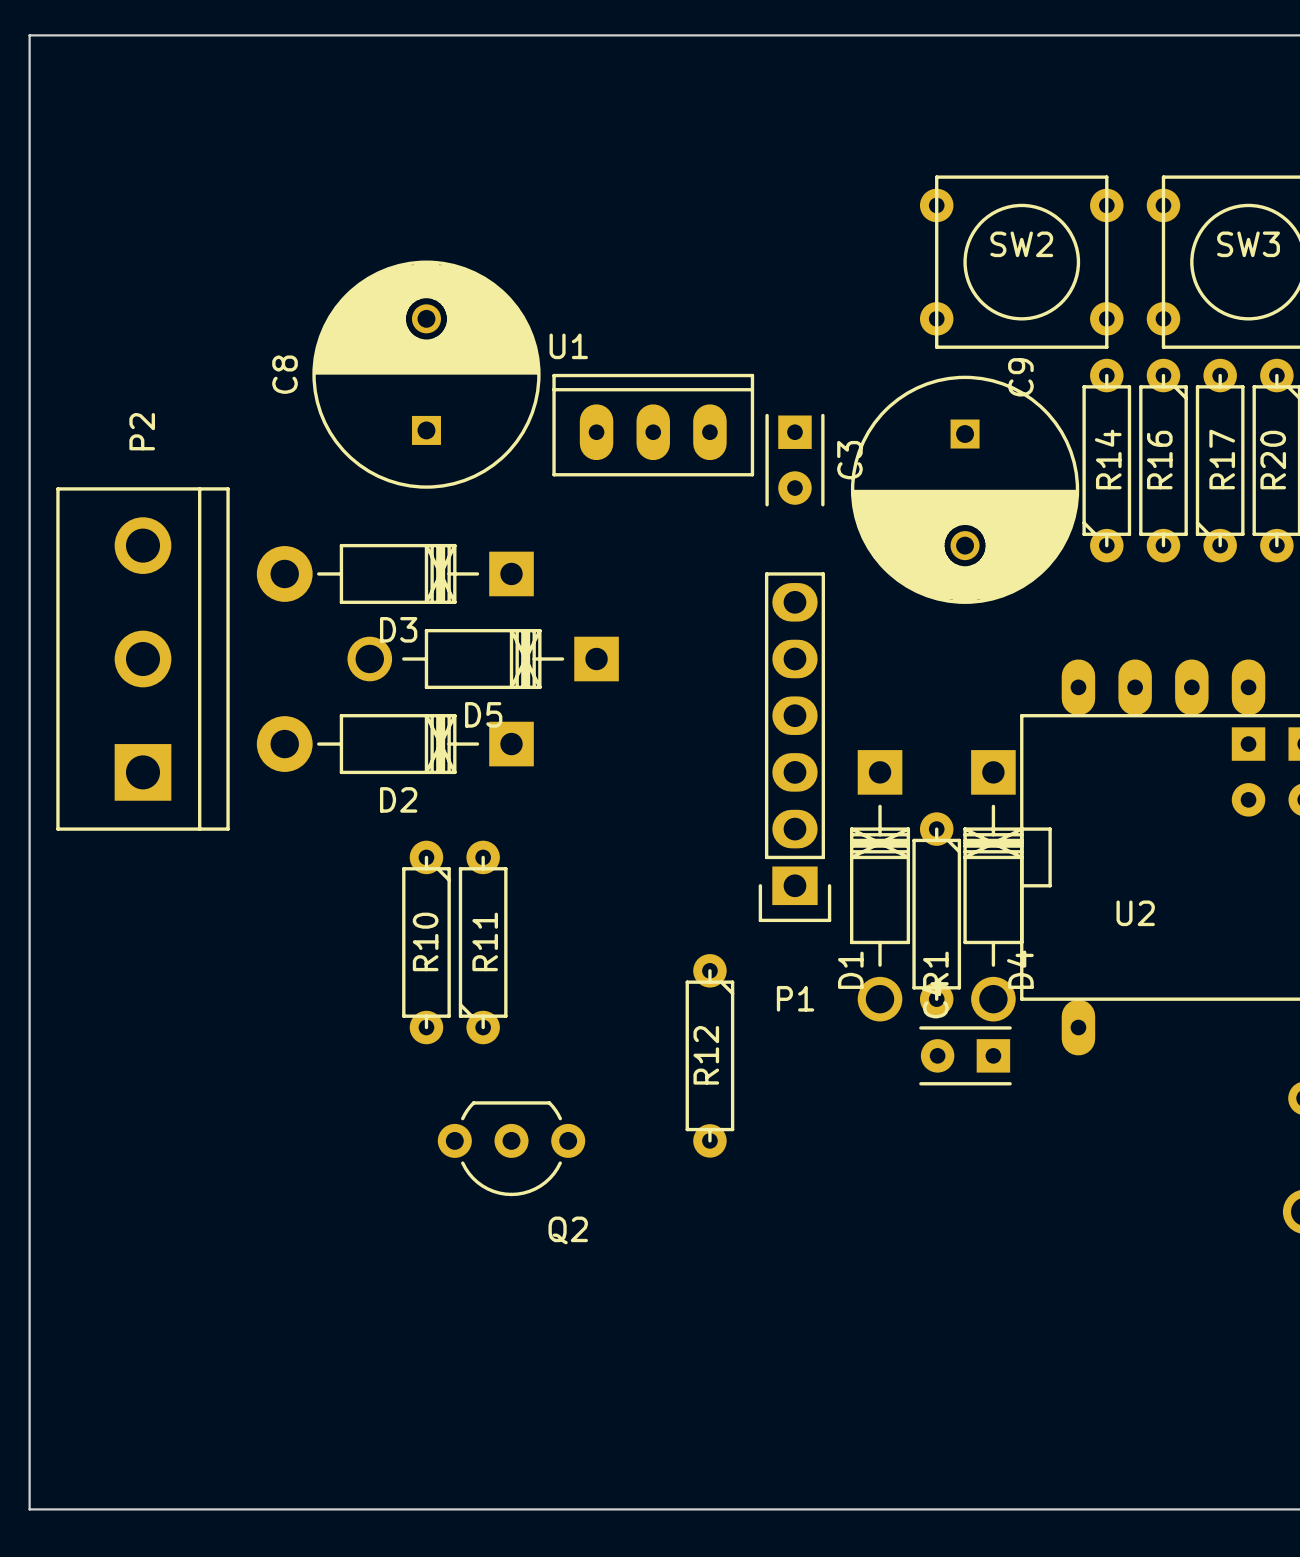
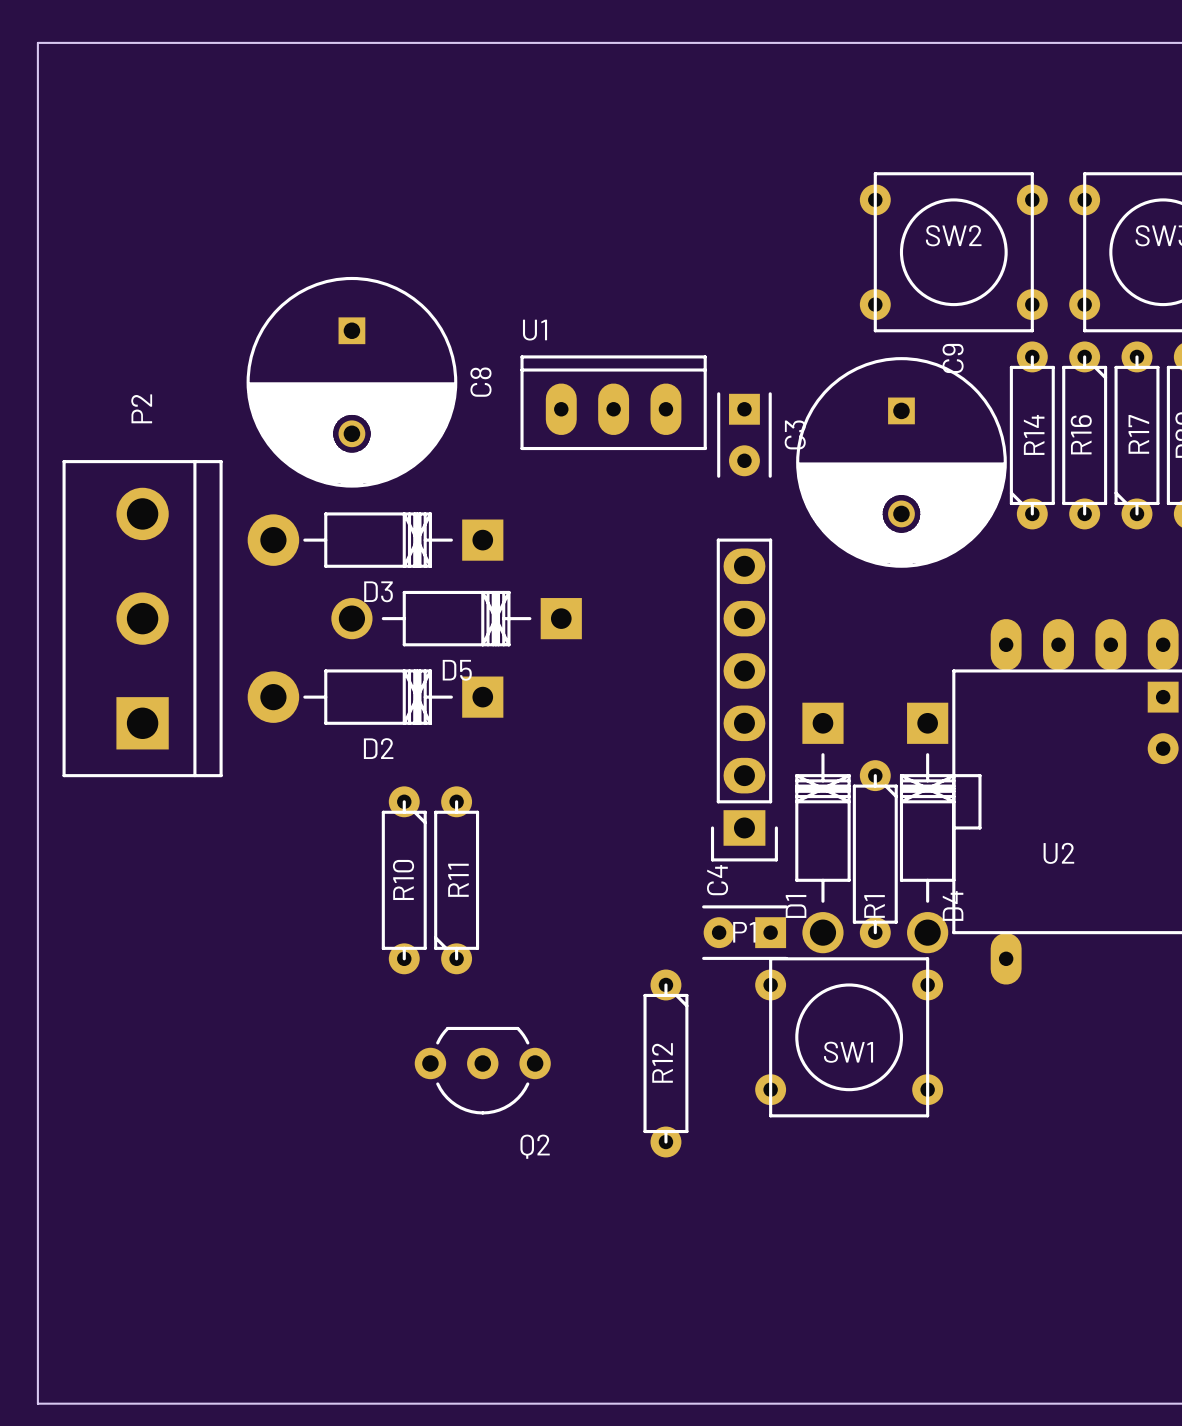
C8 rotation: 0° (426, 374) -> 180° (351, 382)
R12 position: (709, 1055) -> (665, 1063)
C4 position: (965, 1055) -> (744, 932)
SW1: none -> (849, 1037)

